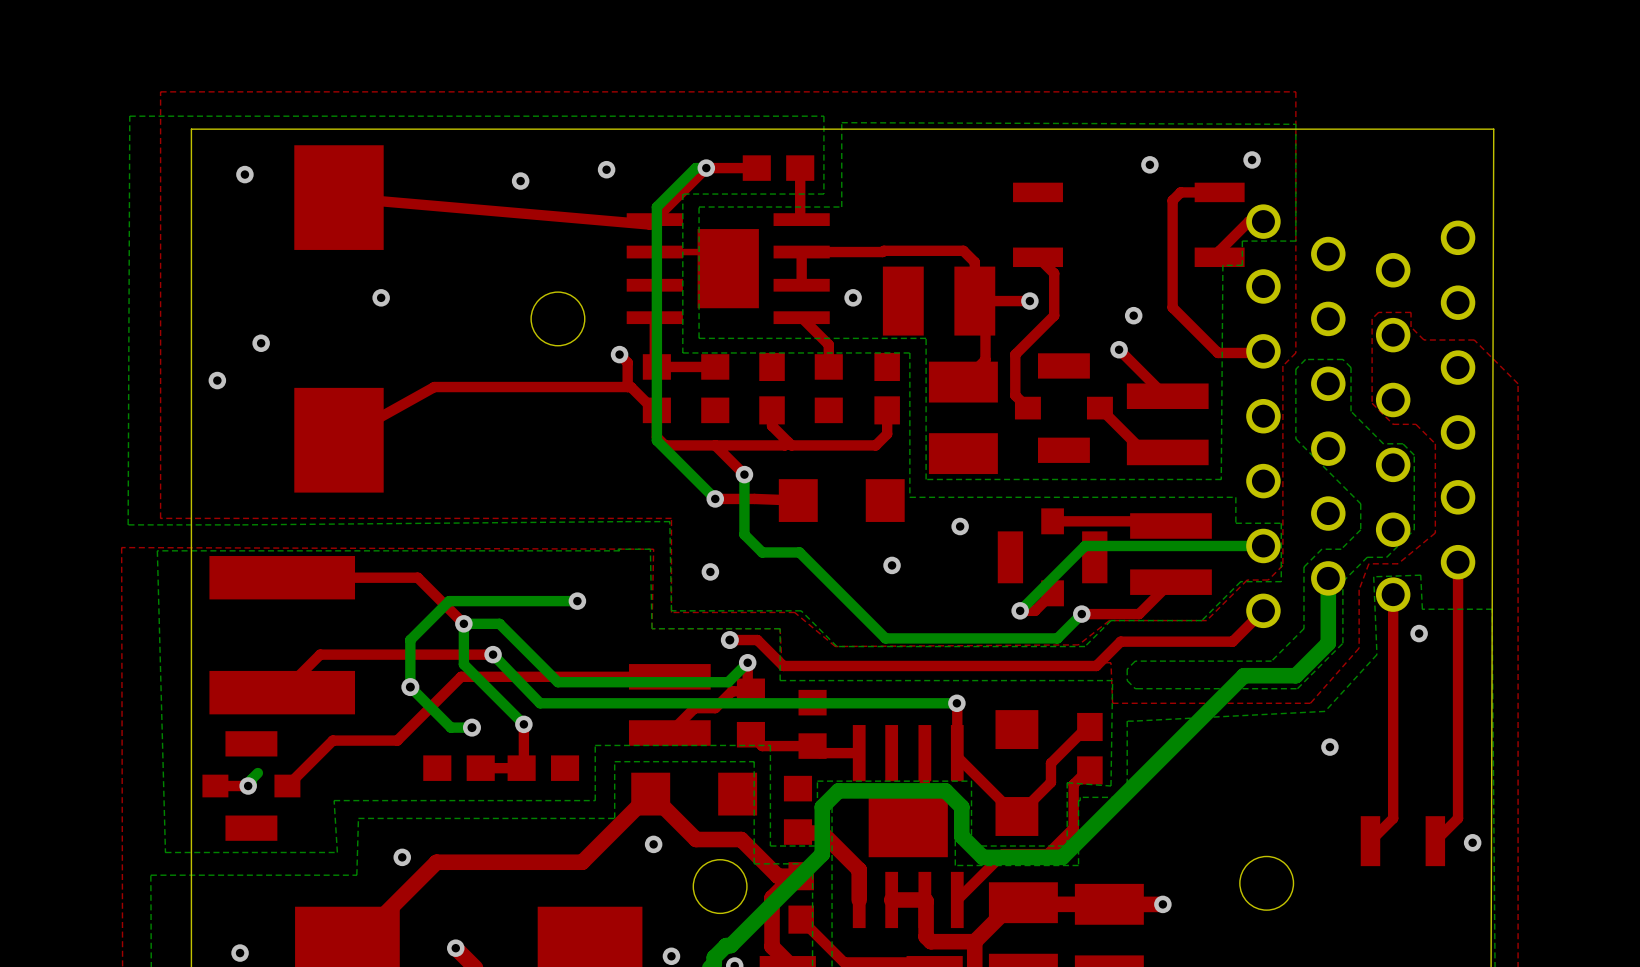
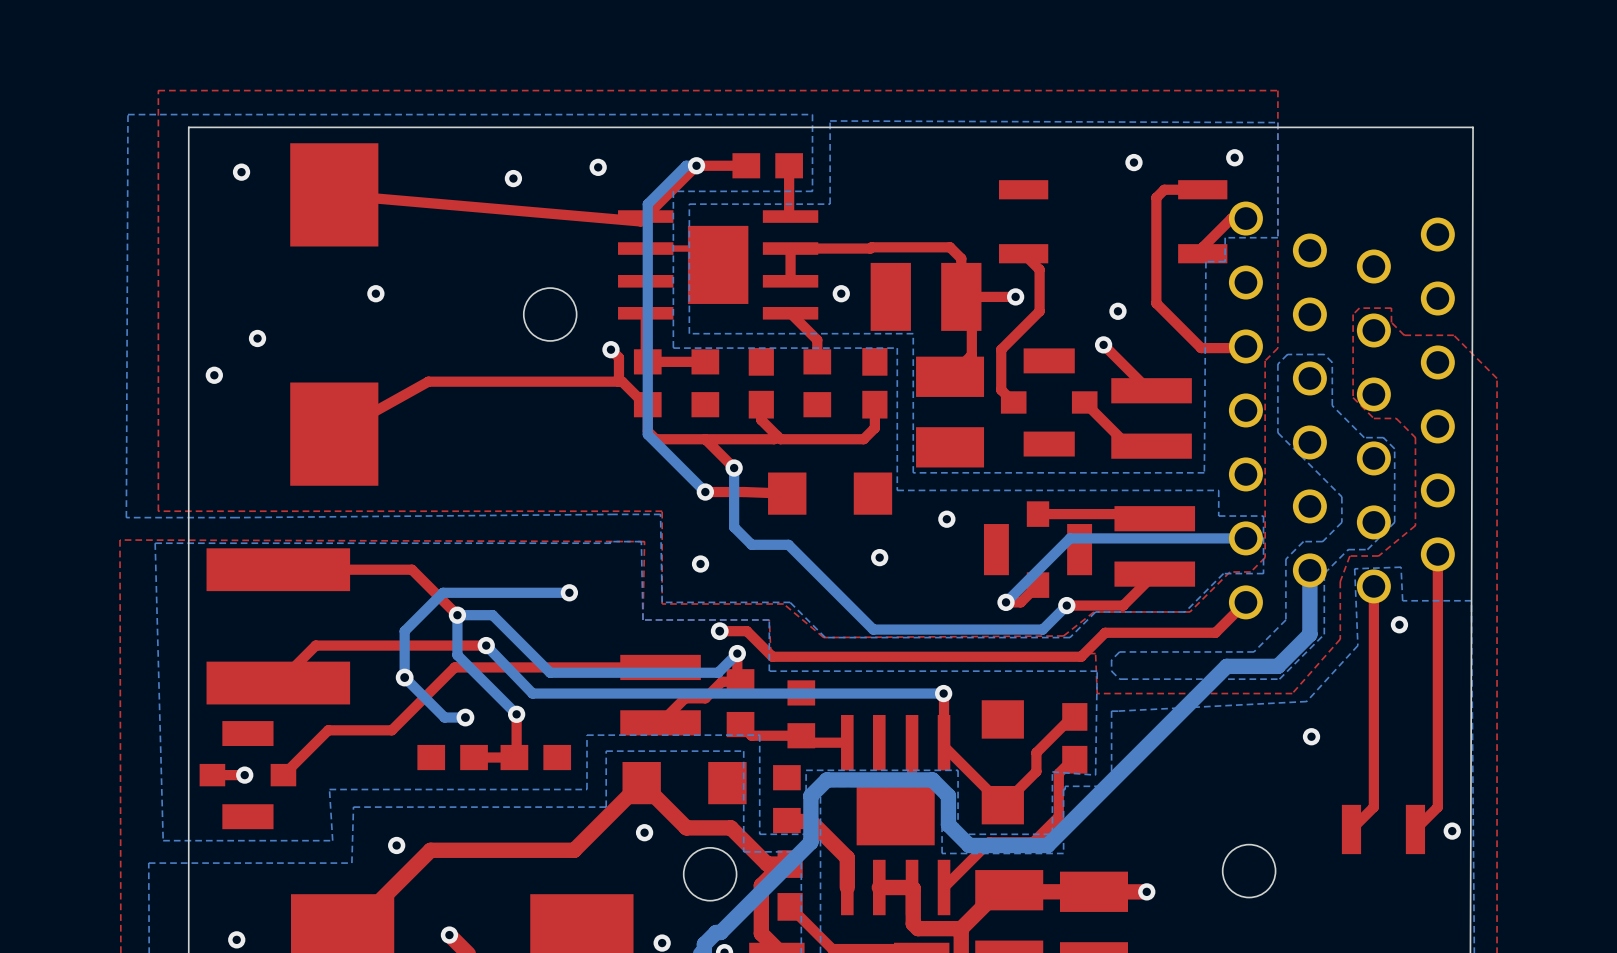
bottom track: (257, 773) (251, 779) (251, 784) (248, 786) -> none

